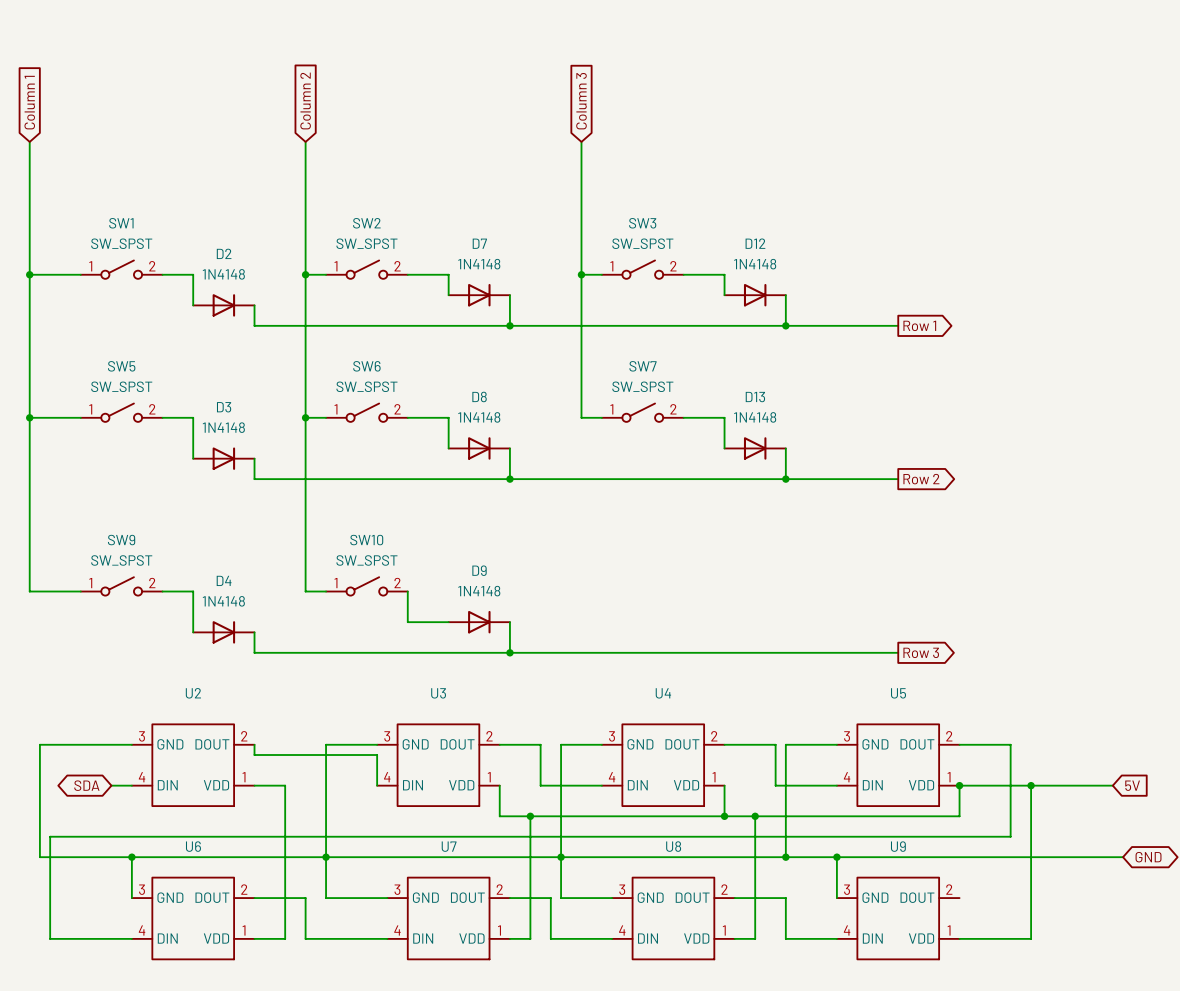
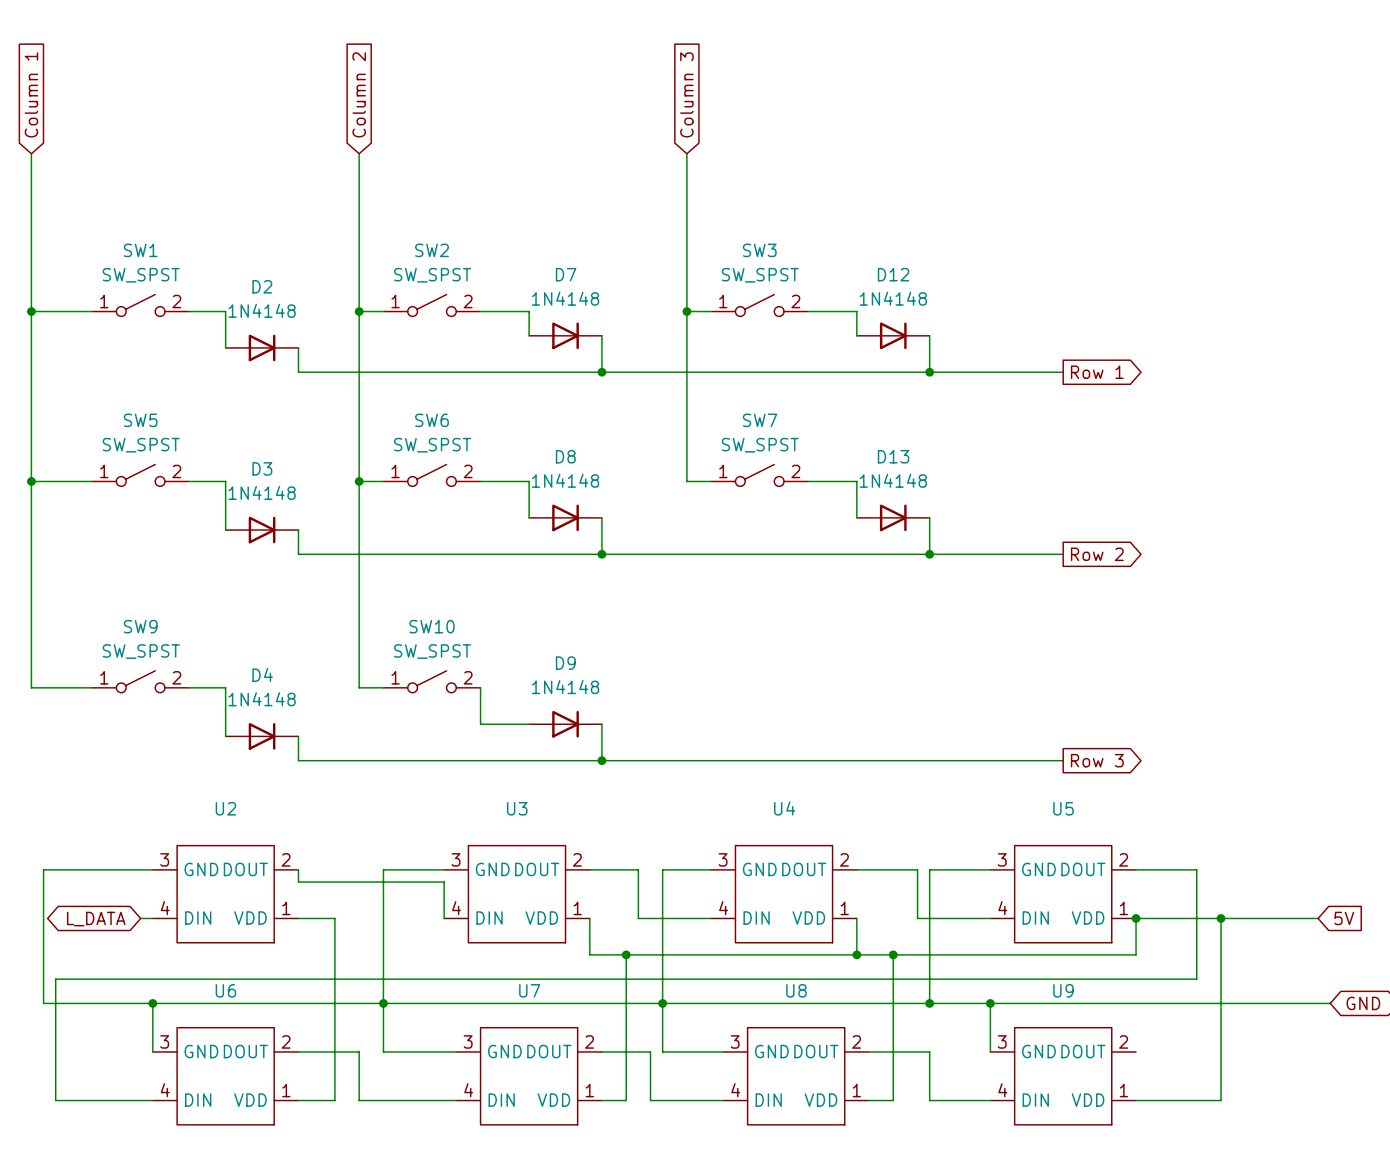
global label: none -> L_DATA (96, 919)
global label: SDA (86, 785) -> none
wire: (111, 785) (121, 785) -> none

